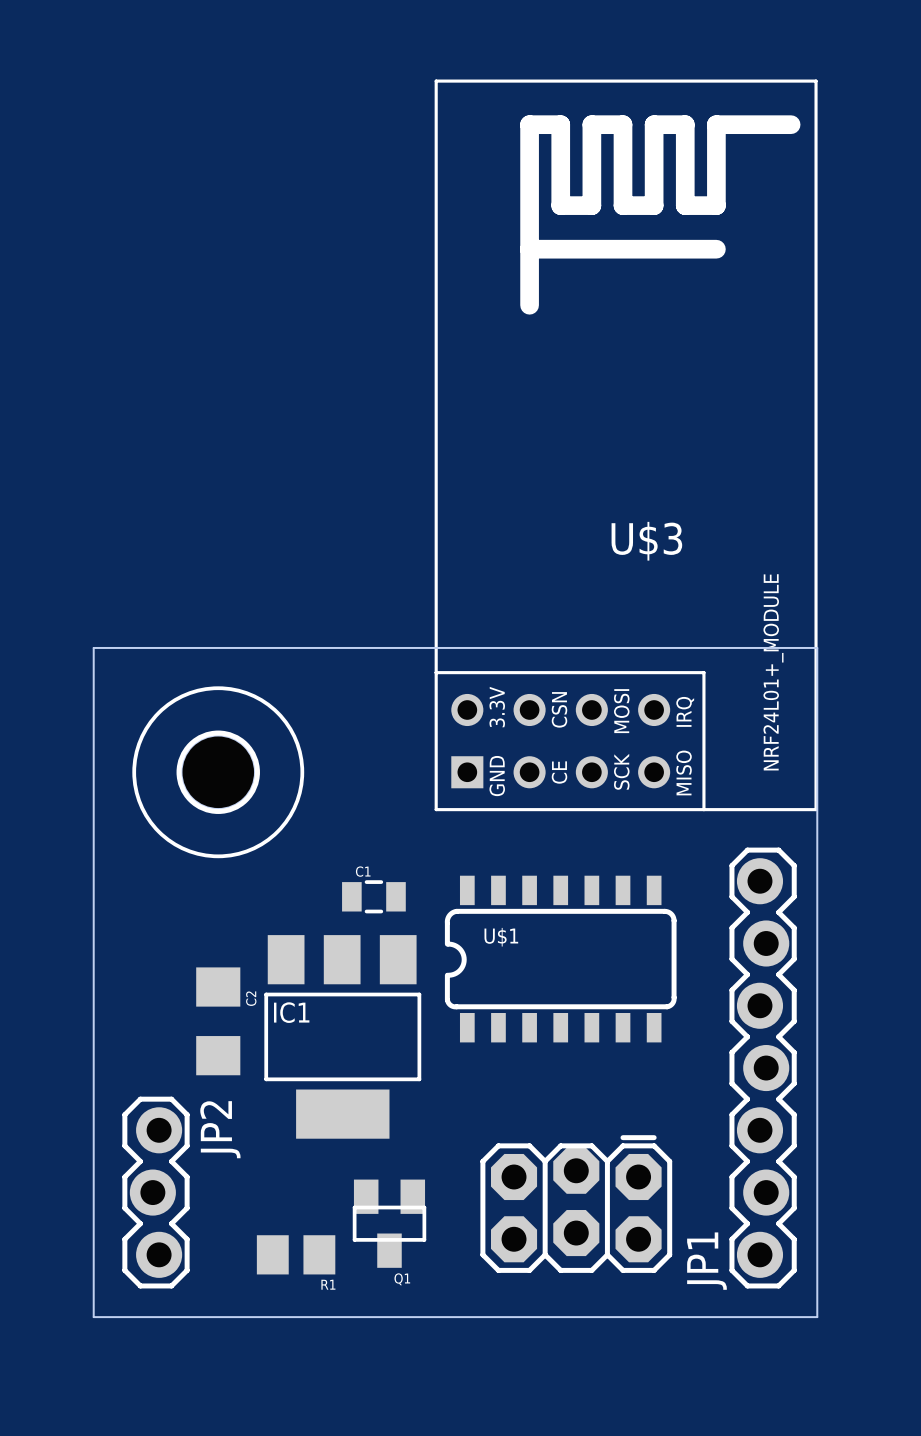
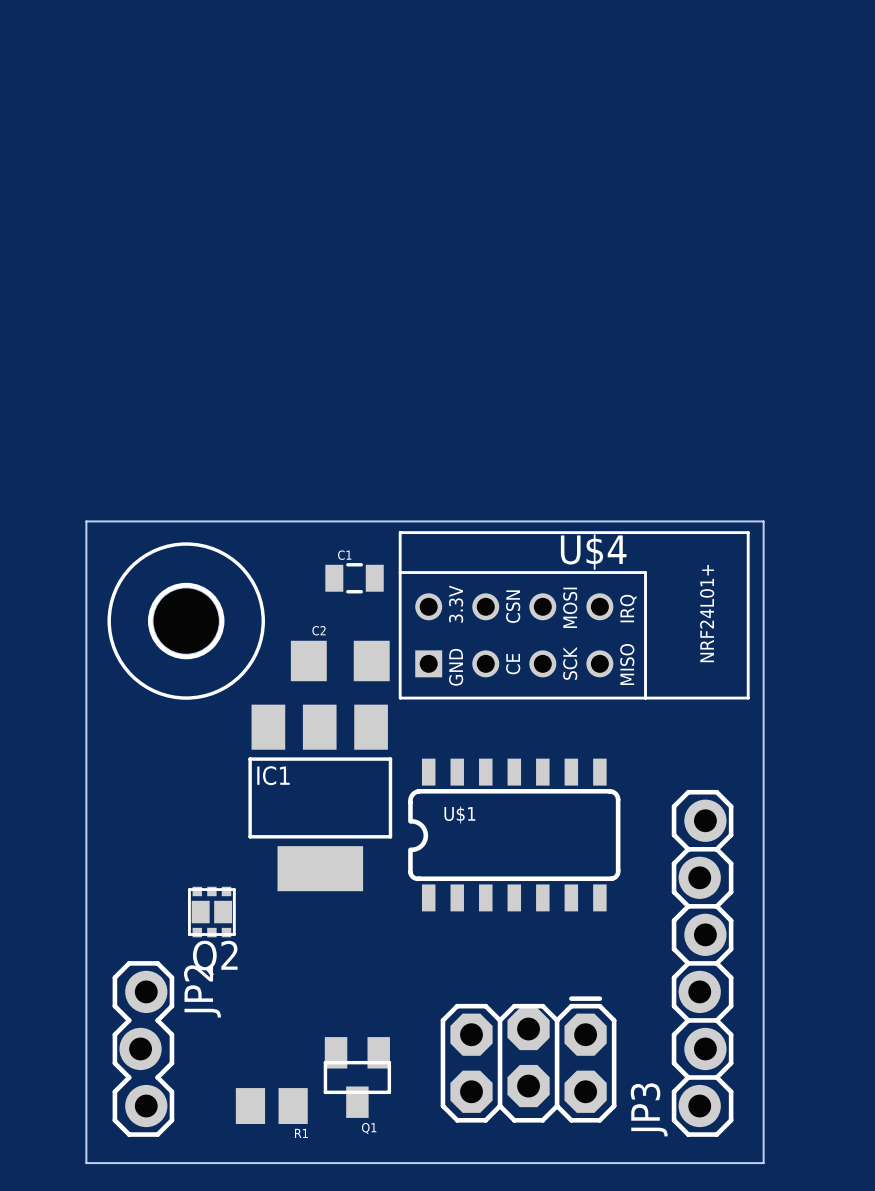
U$3: NRF24L01+_MODULE (626, 445) -> none
board edge: (93, 647) (817, 647) (817, 1317) -> (86, 549) (86, 521) (763, 521) (763, 1163) (749, 1163)
U$4: none -> NRF24L01+ (574, 615)
part position: (218, 772) -> (186, 621)
C1 position: (373, 896) -> (354, 578)
C2 name position: C2 (251, 998) -> C2 (319, 630)
C2 rotation: 0° (218, 1021) -> 90° clockwise (340, 660)
C2 position: (218, 1021) -> (340, 660)
IC1 position: (342, 1036) -> (320, 797)
Q2: none -> (211, 912)
JP1: (763, 1068) -> none
JP3: none -> (702, 963)

